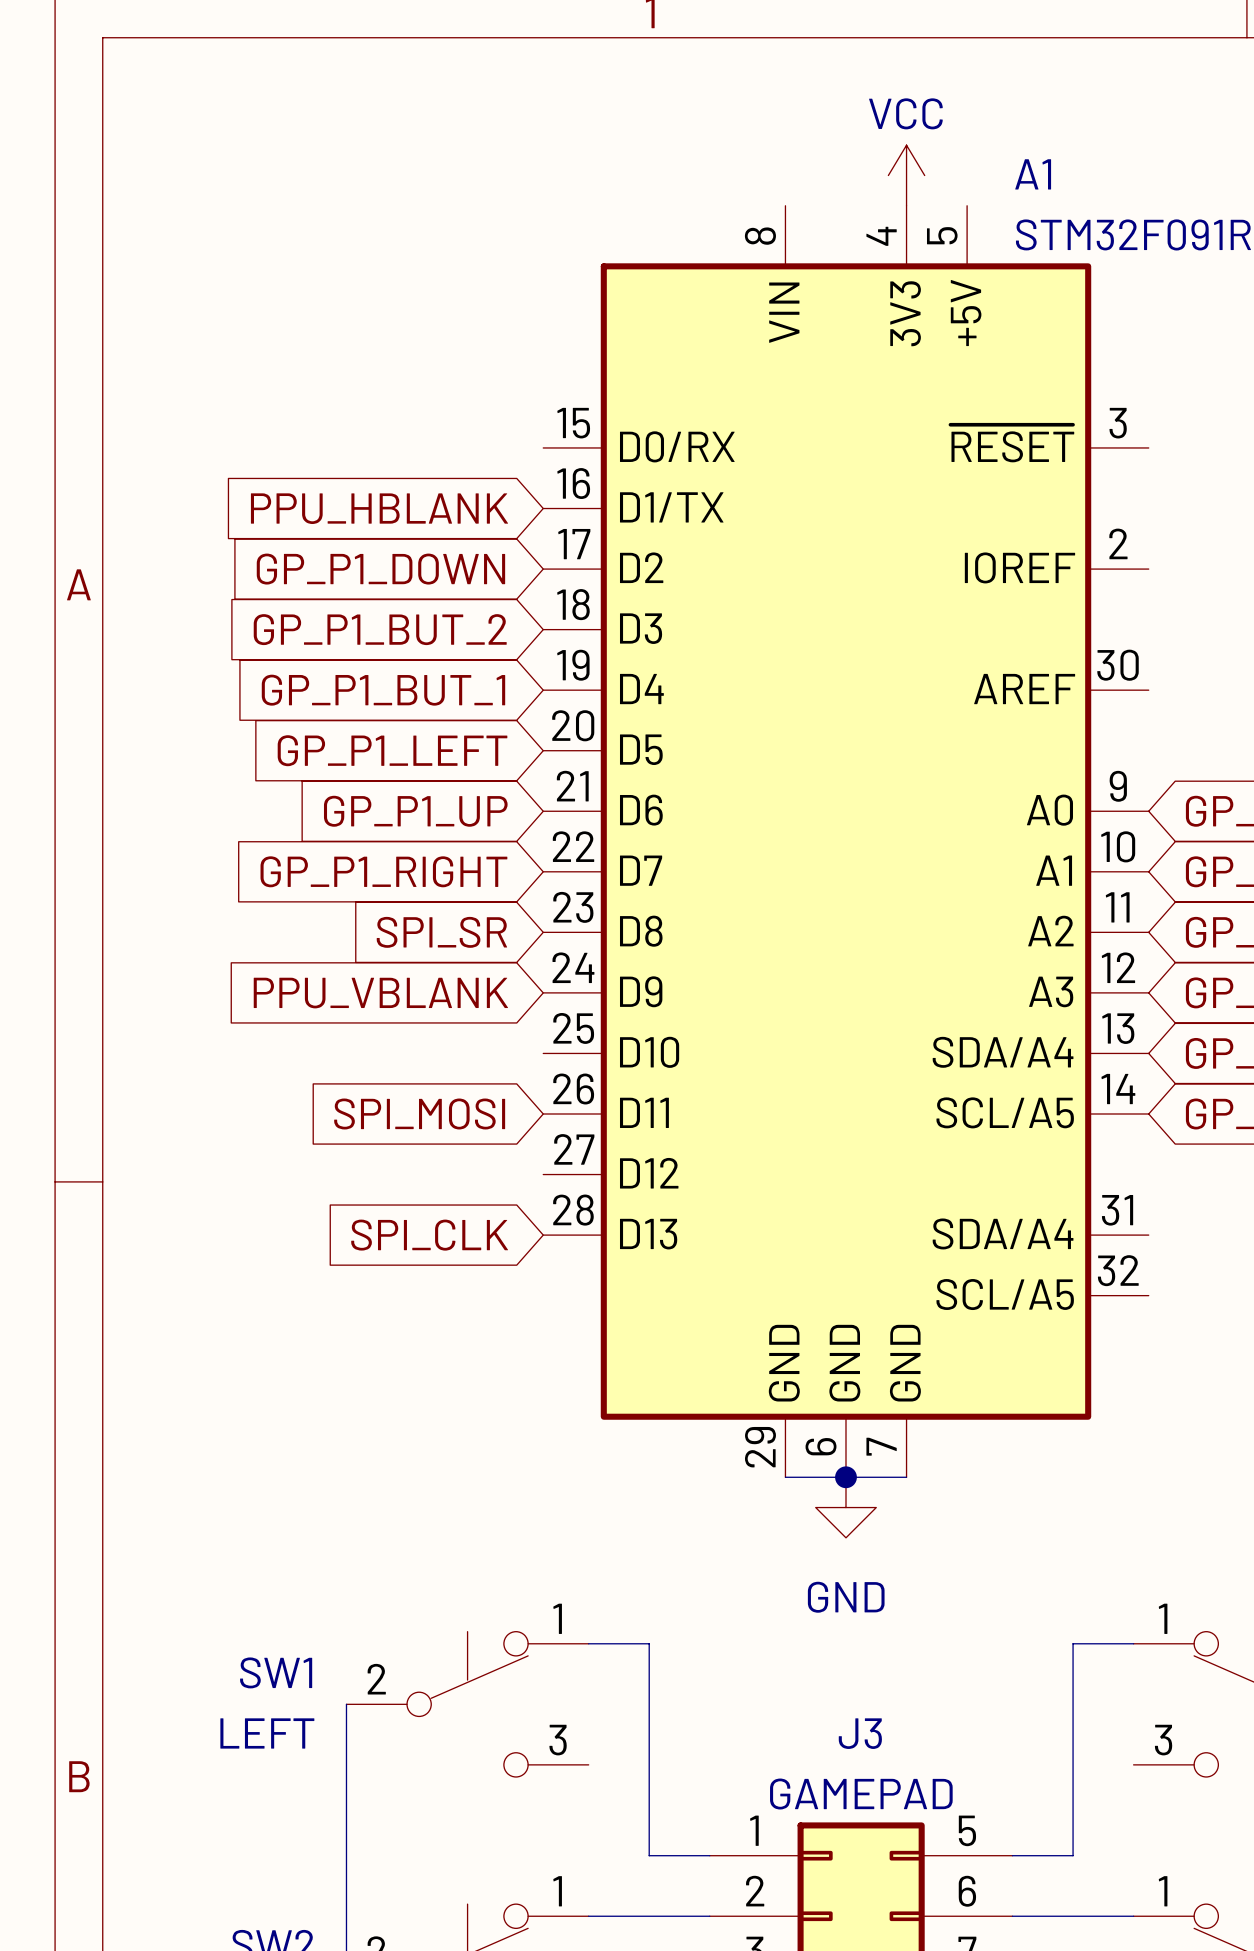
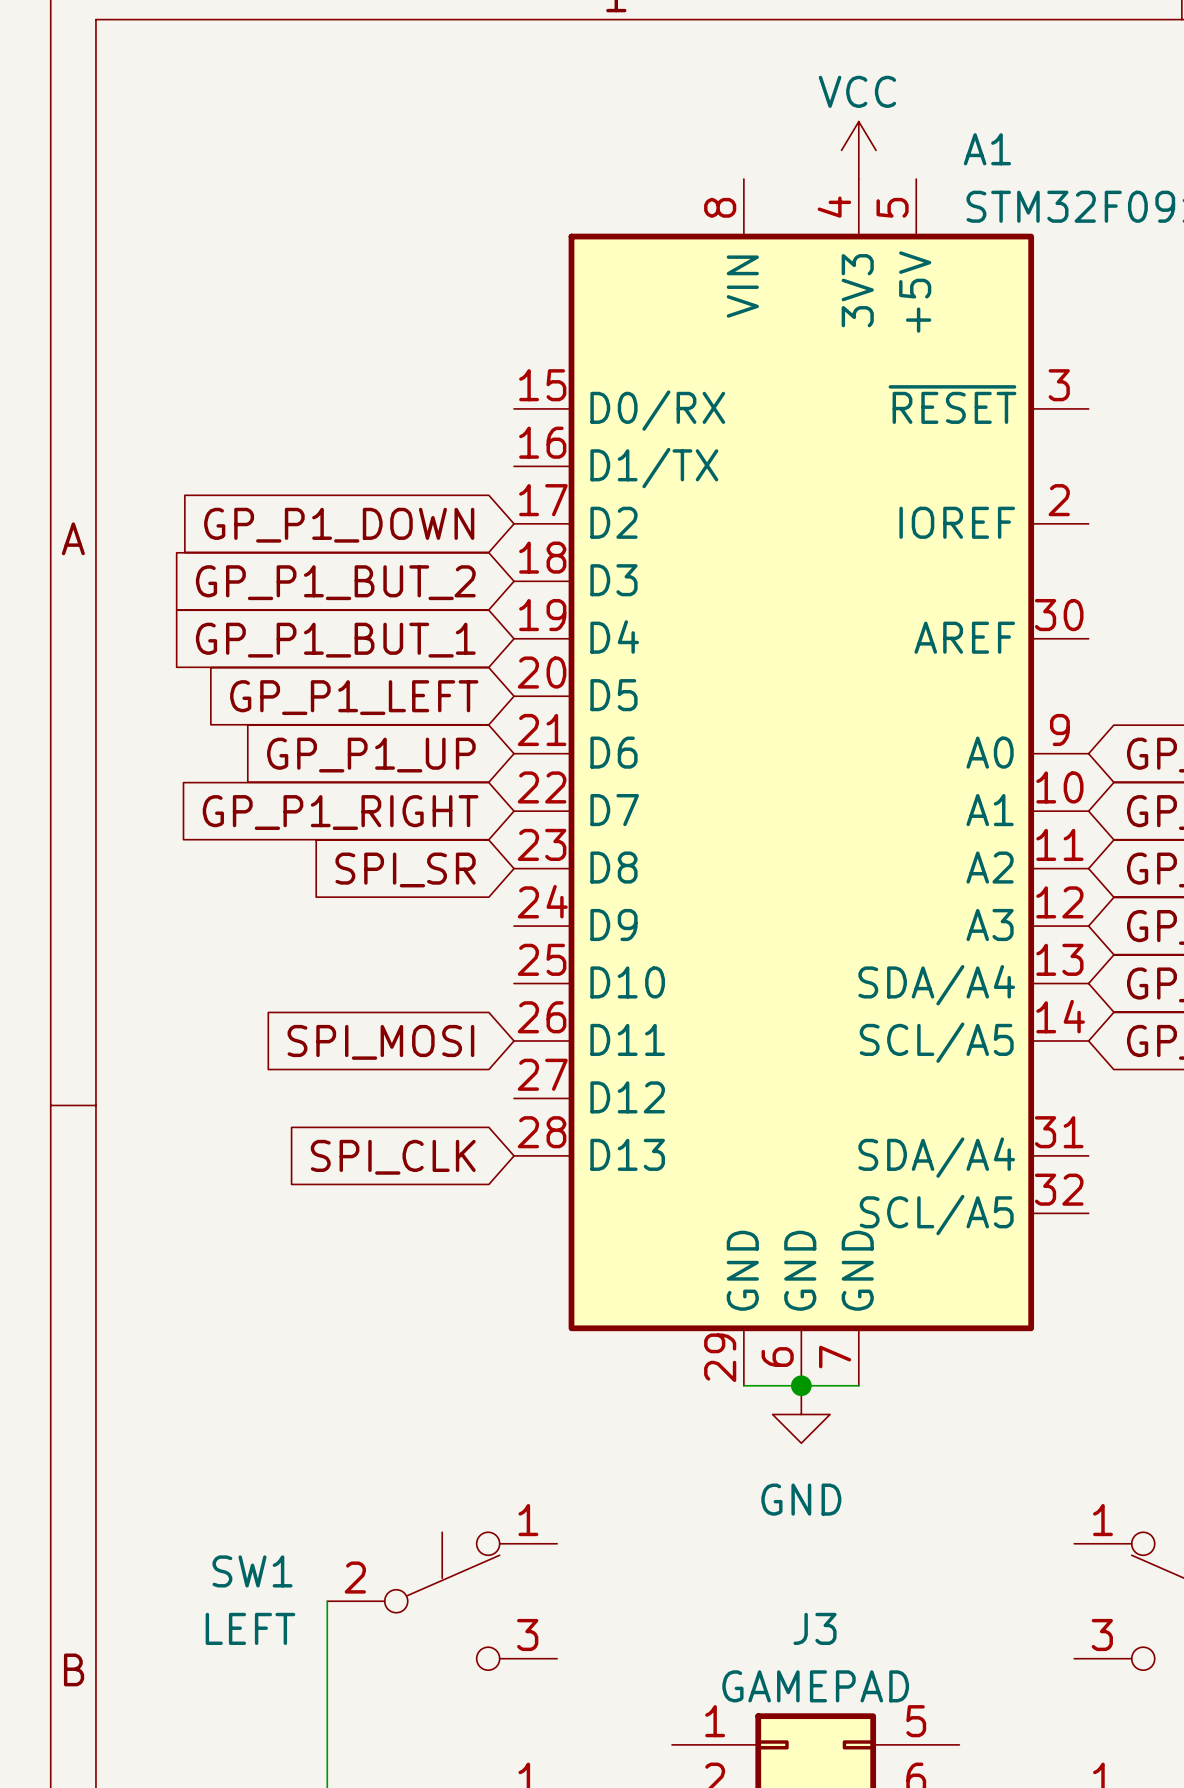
global label: PPU_HBLANK (379, 508) -> none
global label: PPU_VBLANK (380, 993) -> none
wire: (588, 1643) (649, 1643) (649, 1855) (709, 1855) -> none
wire: (1133, 1643) (1073, 1643) (1073, 1855) (1012, 1855) -> none

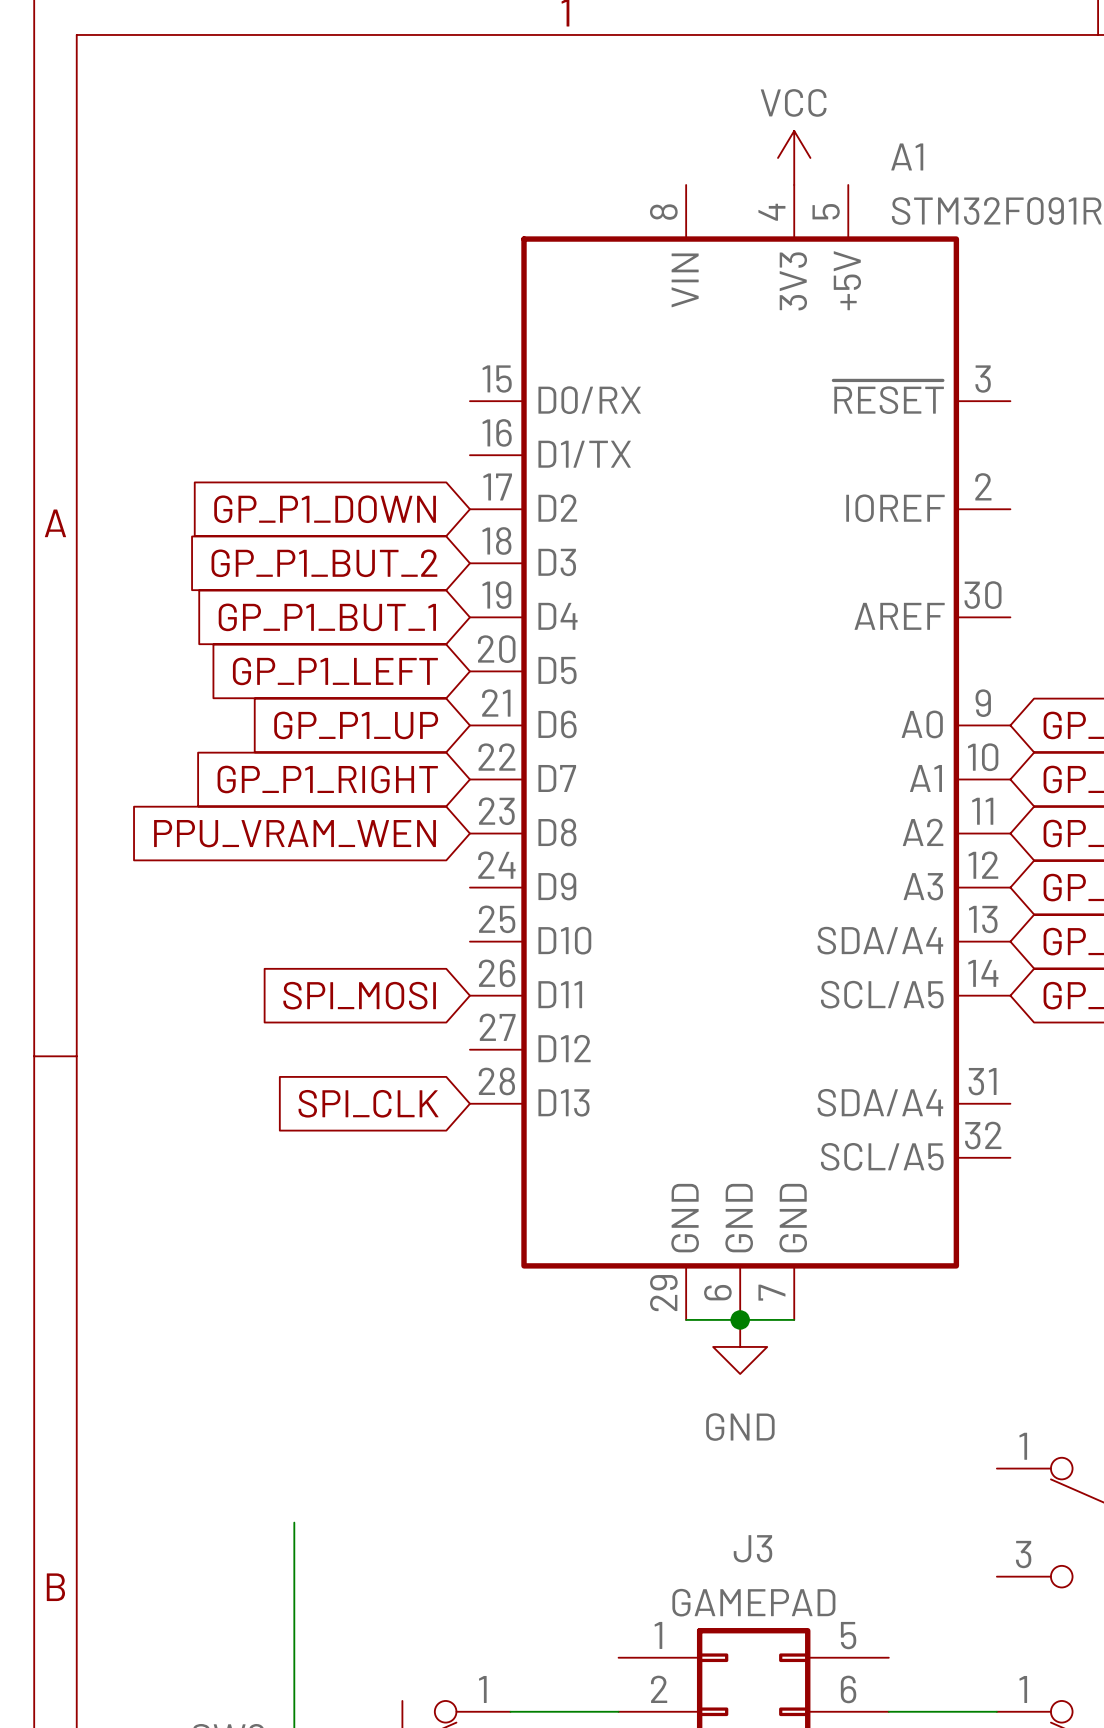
global label: SPI_SR (405, 869) -> PPU_VRAM_WEN (295, 833)
SW1: LEFT (442, 1601) -> none

